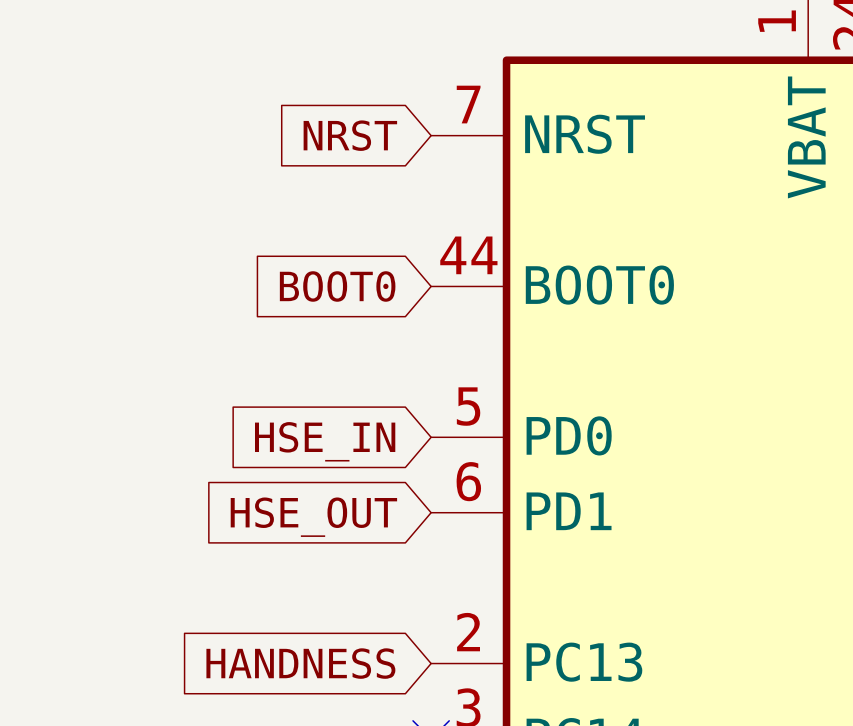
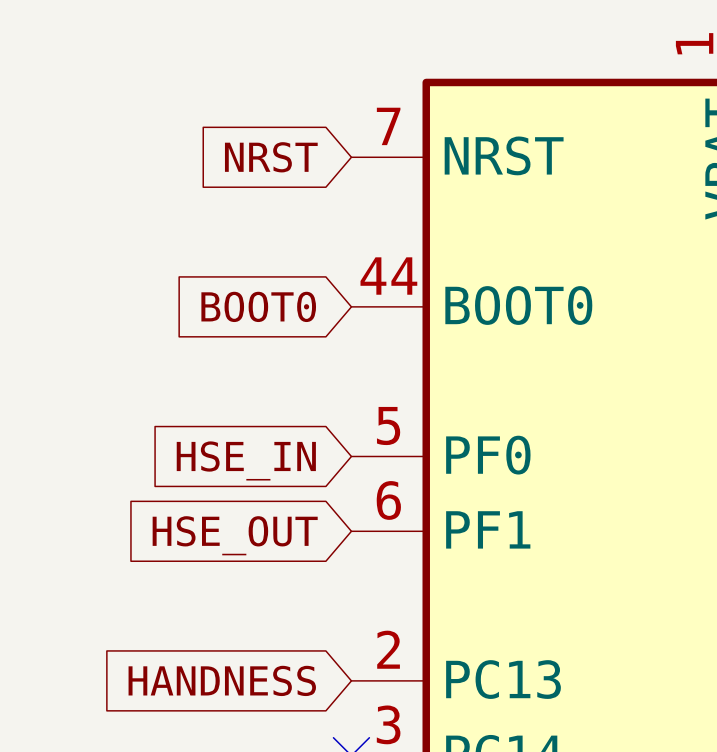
part pin name: PD0 (569, 435) -> PF0 (488, 455)
part pin name: PD1 (569, 511) -> PF1 (488, 529)

